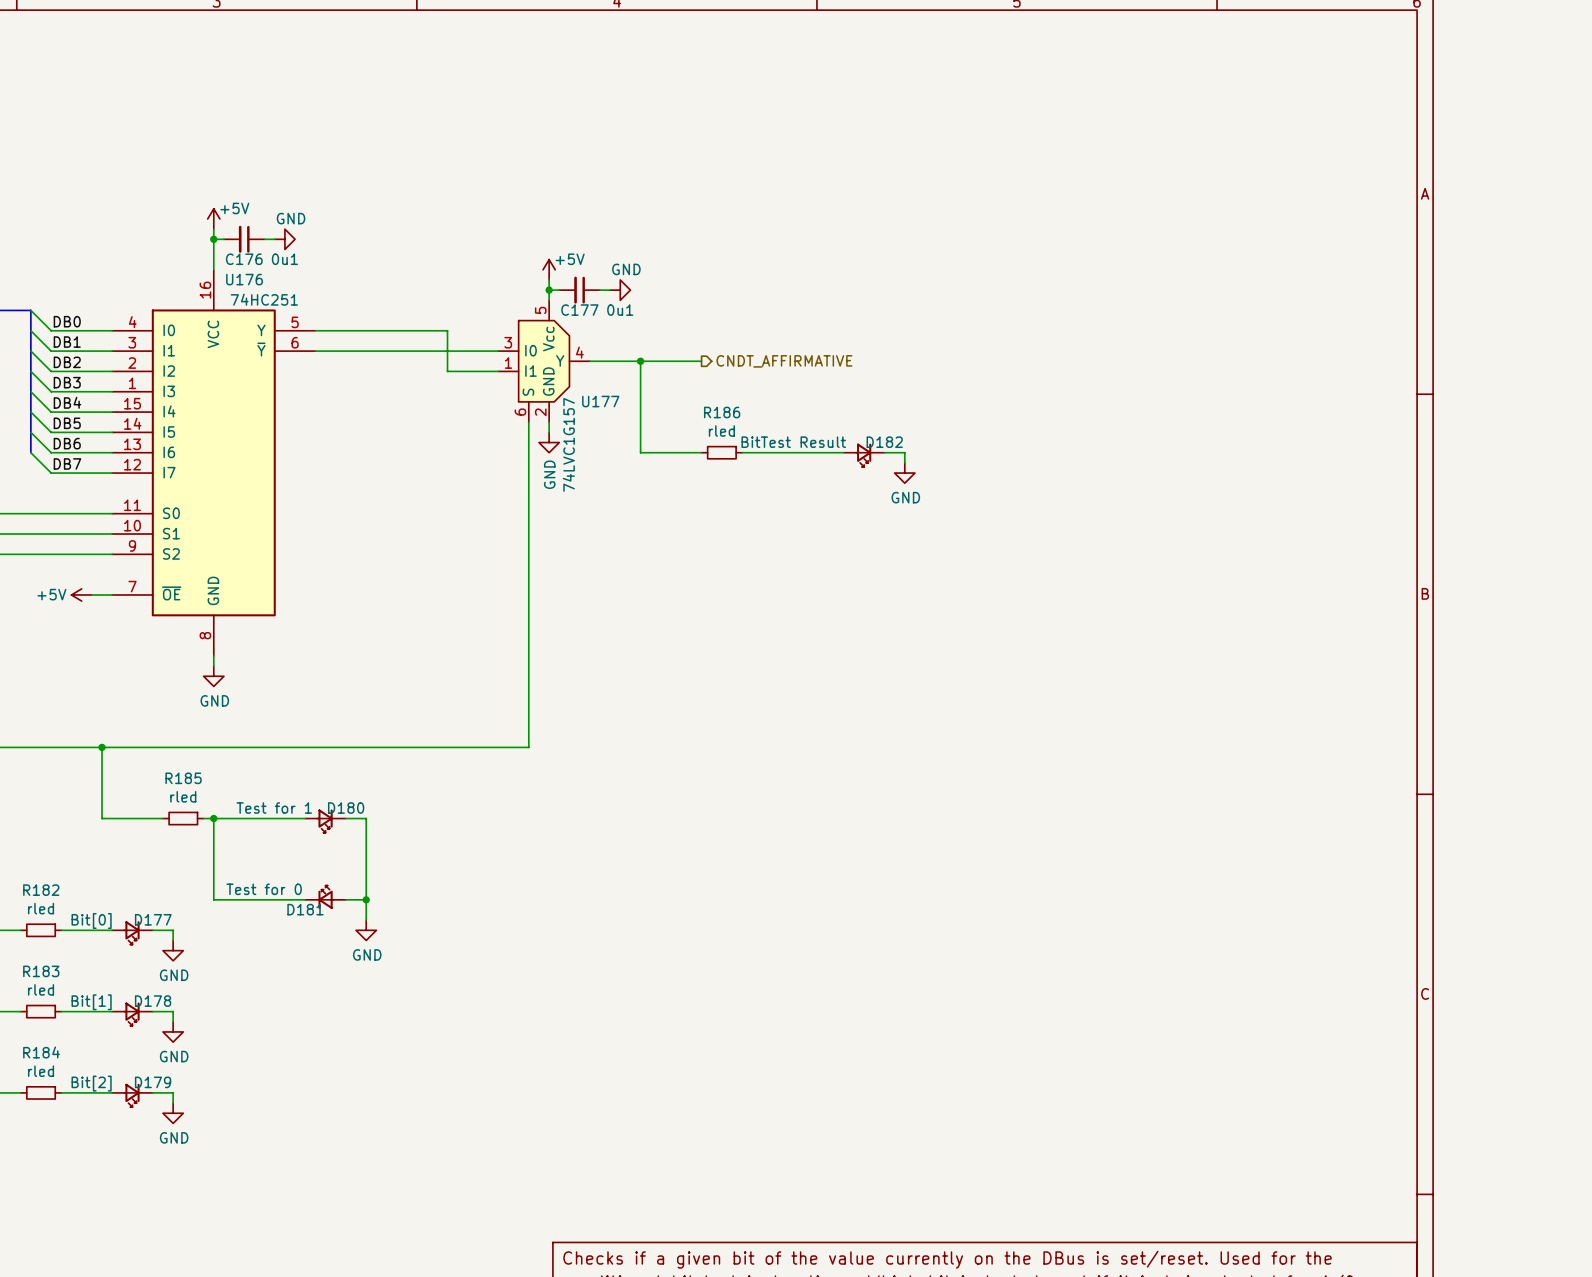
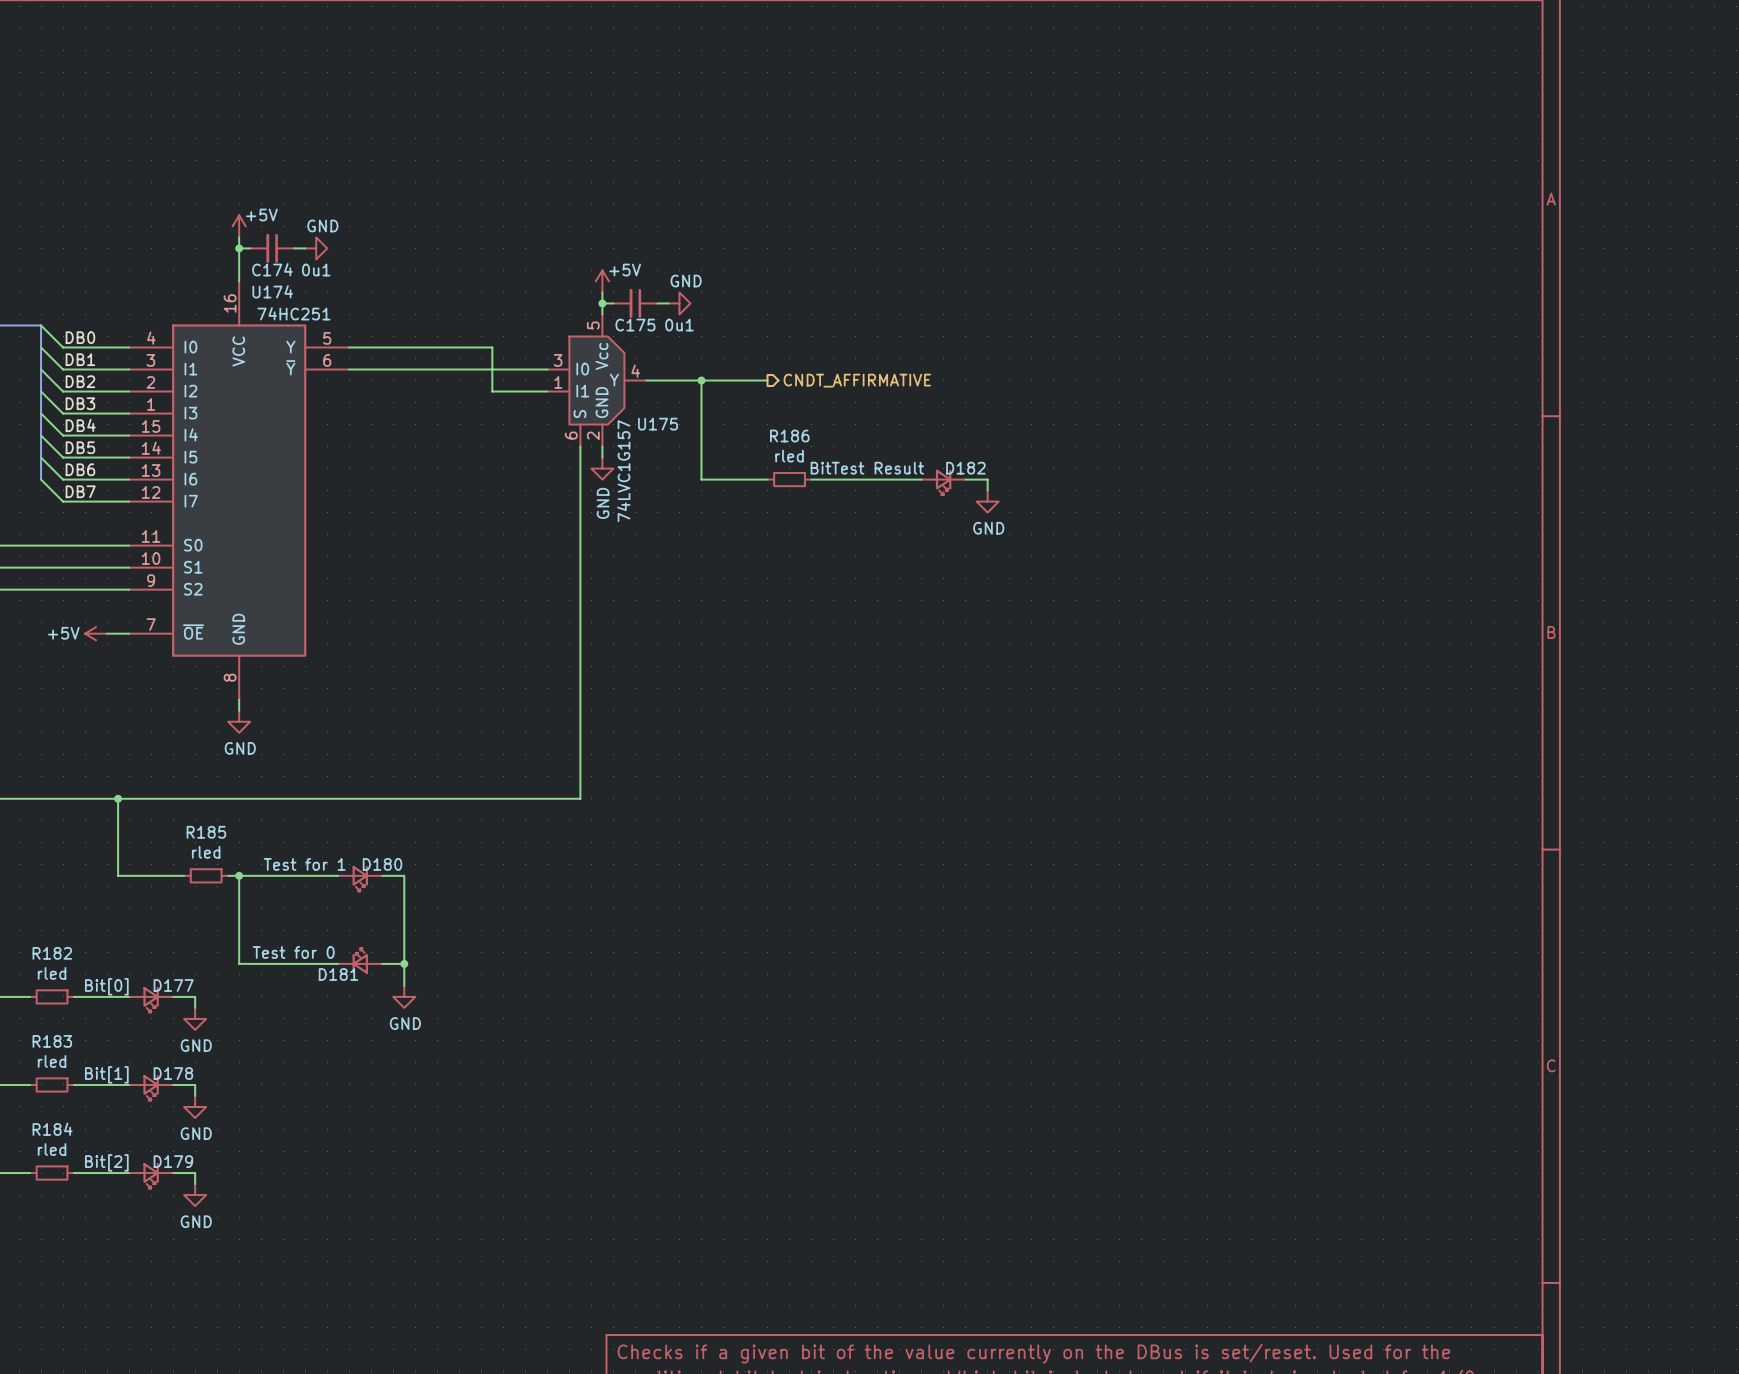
C176 name: C176 (244, 259) -> C174 (272, 269)
U176 name: U176 (244, 279) -> U174 (272, 291)
C177 name: C177 (579, 310) -> C175 (635, 325)
U177 name: U177 (600, 401) -> U175 (658, 424)

